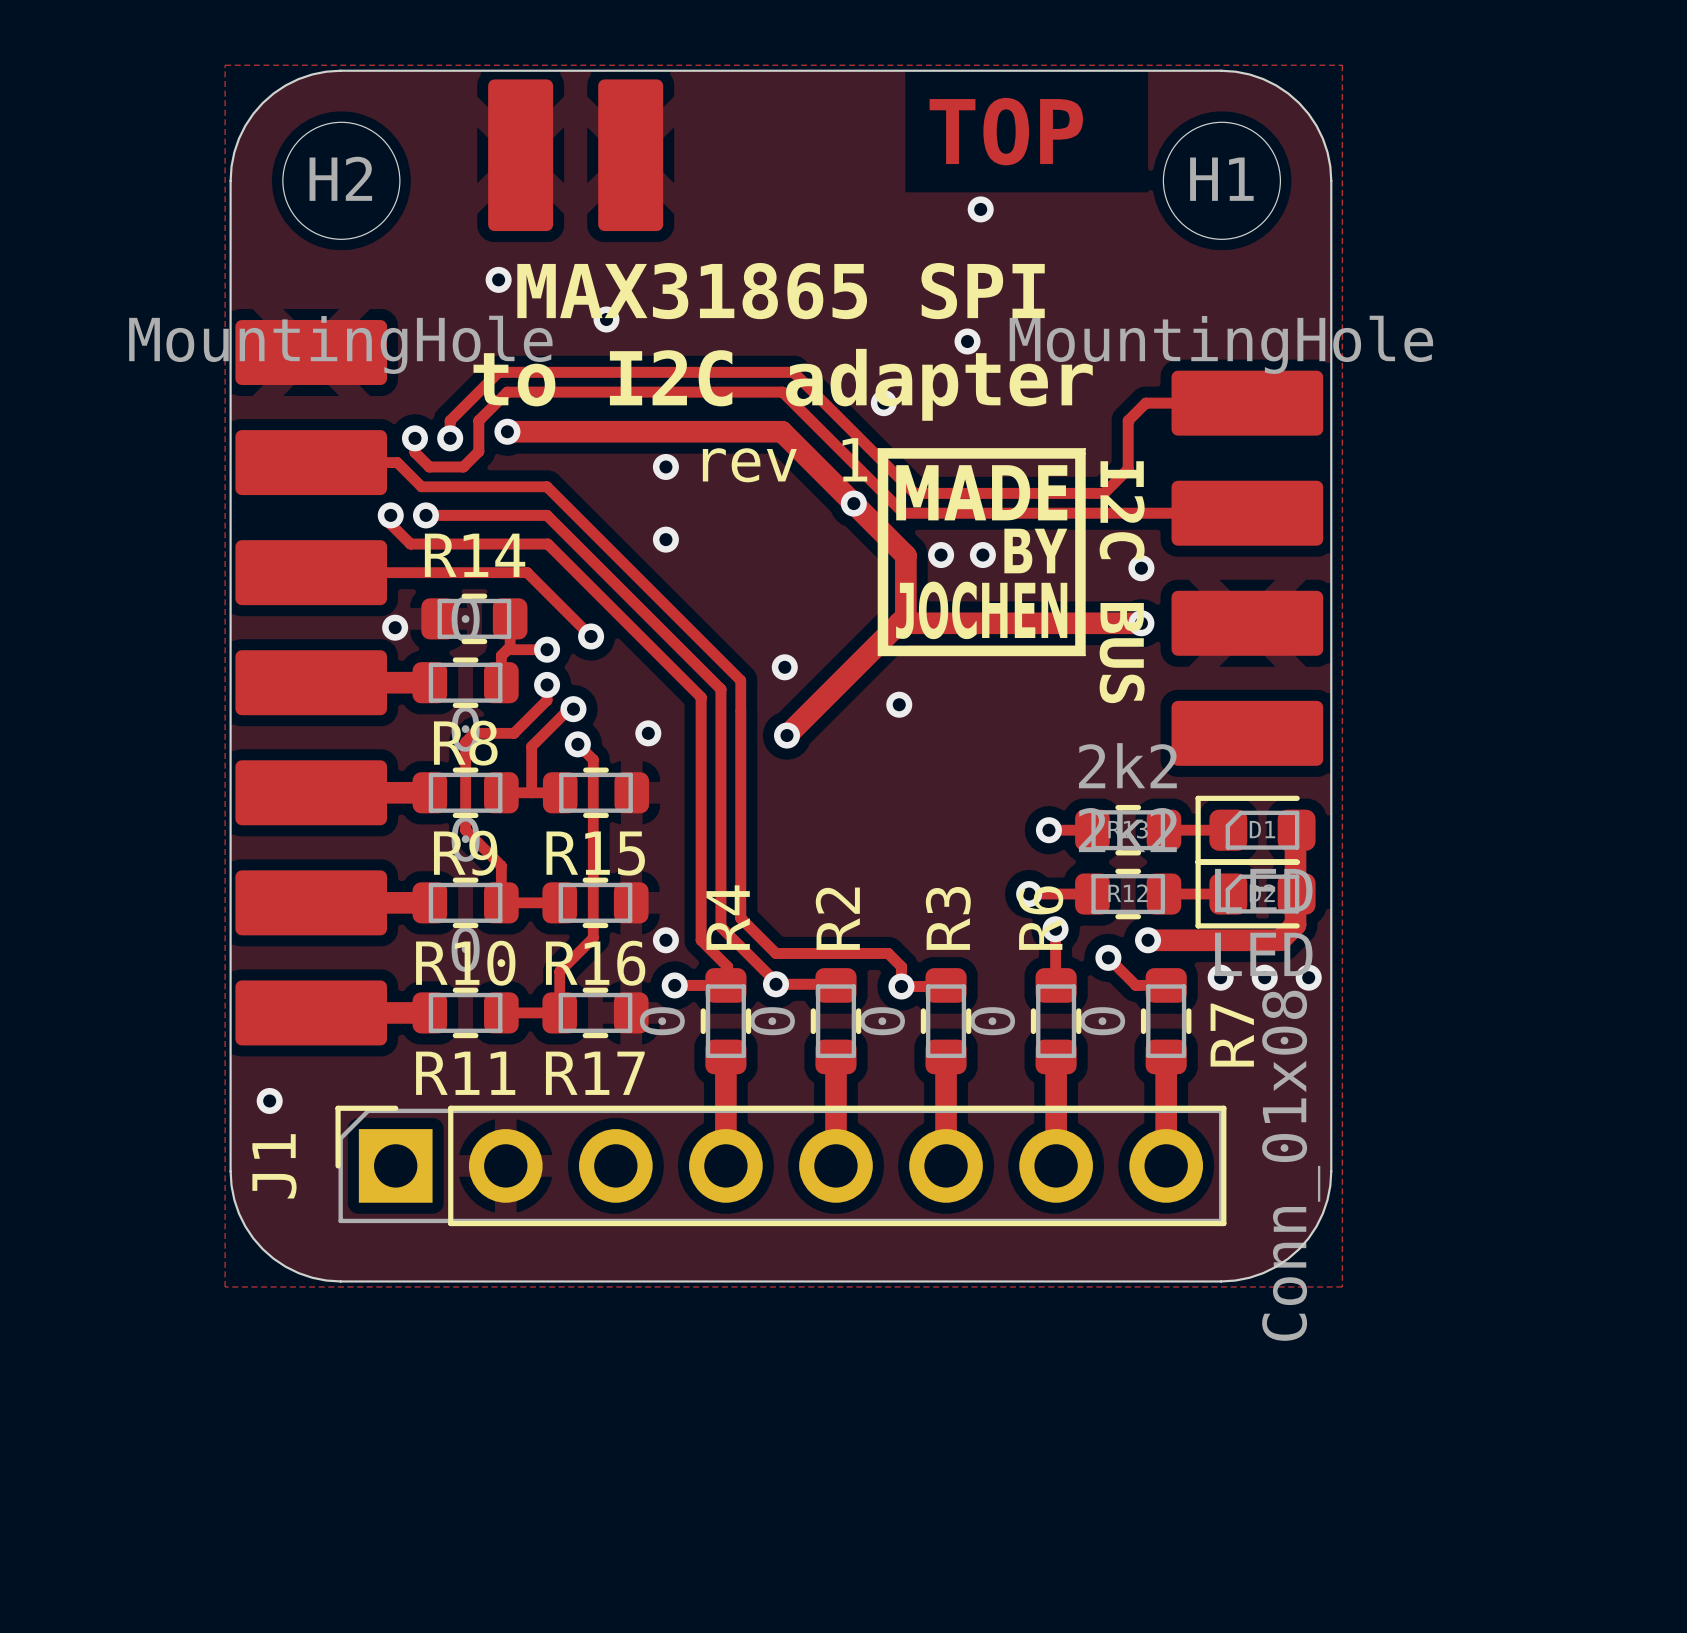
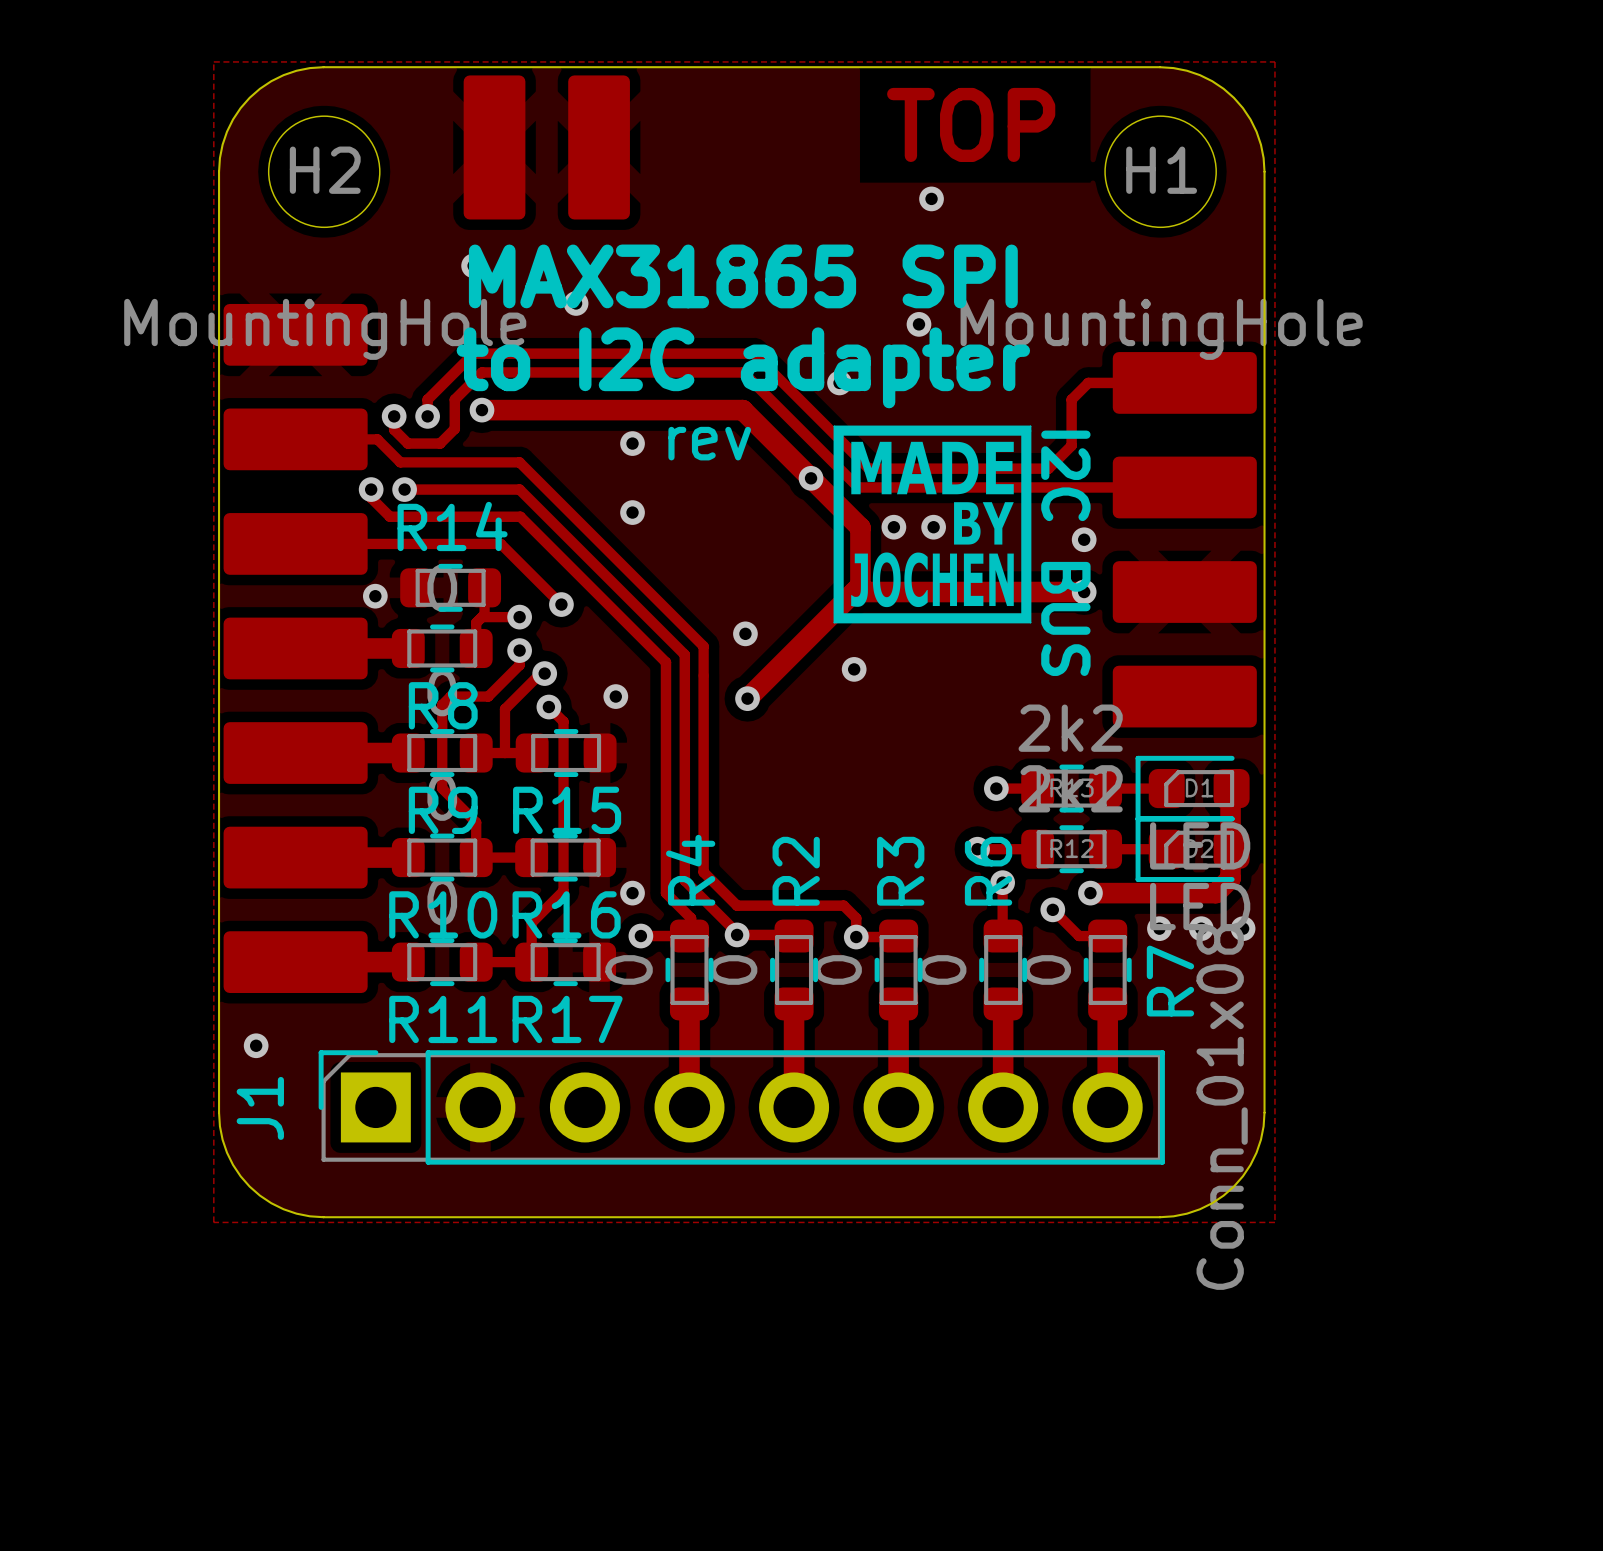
text: rev 1 (785, 460) -> rev (709, 443)

